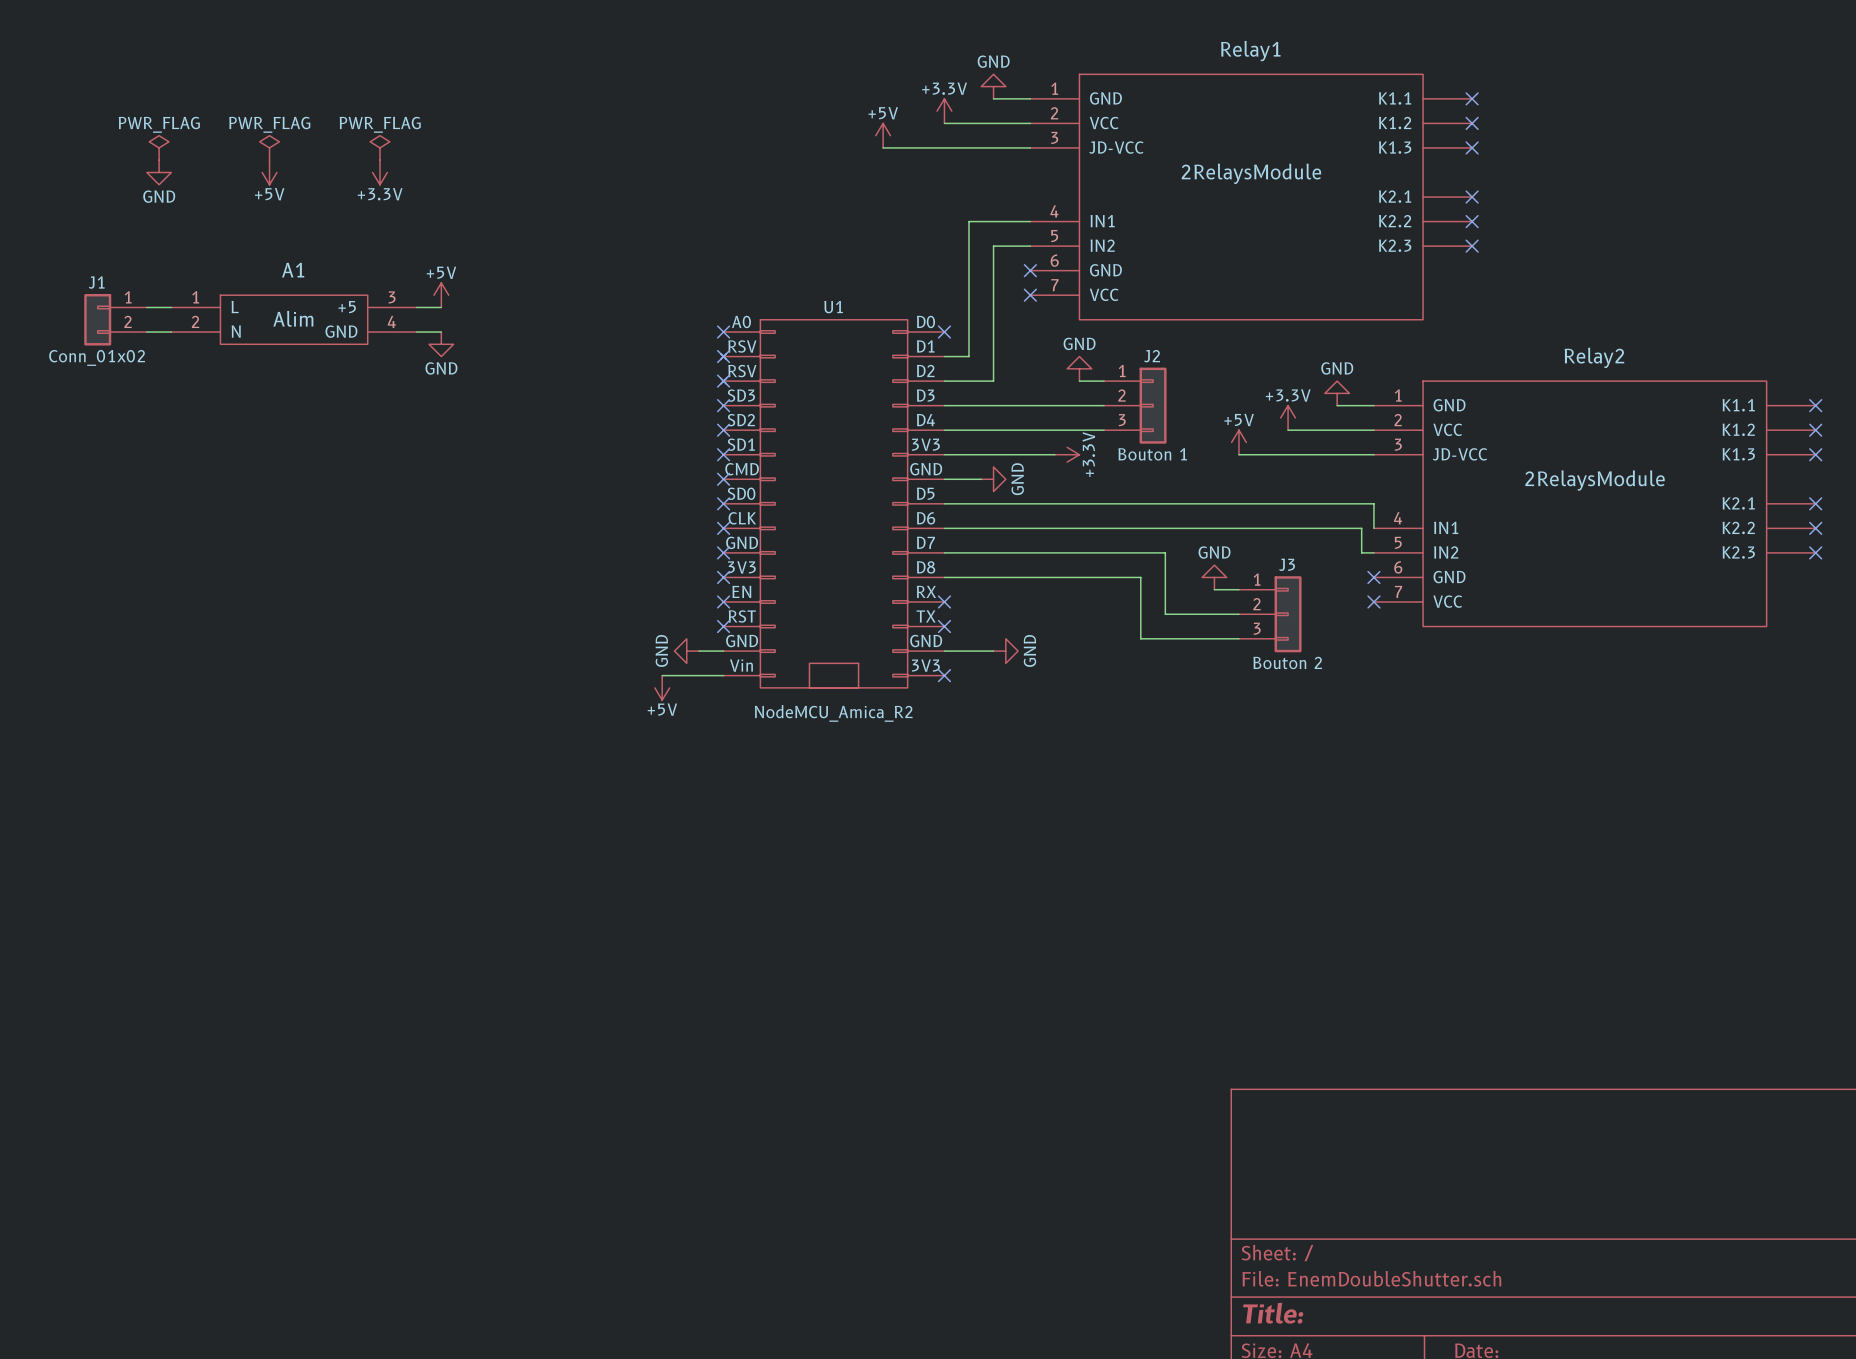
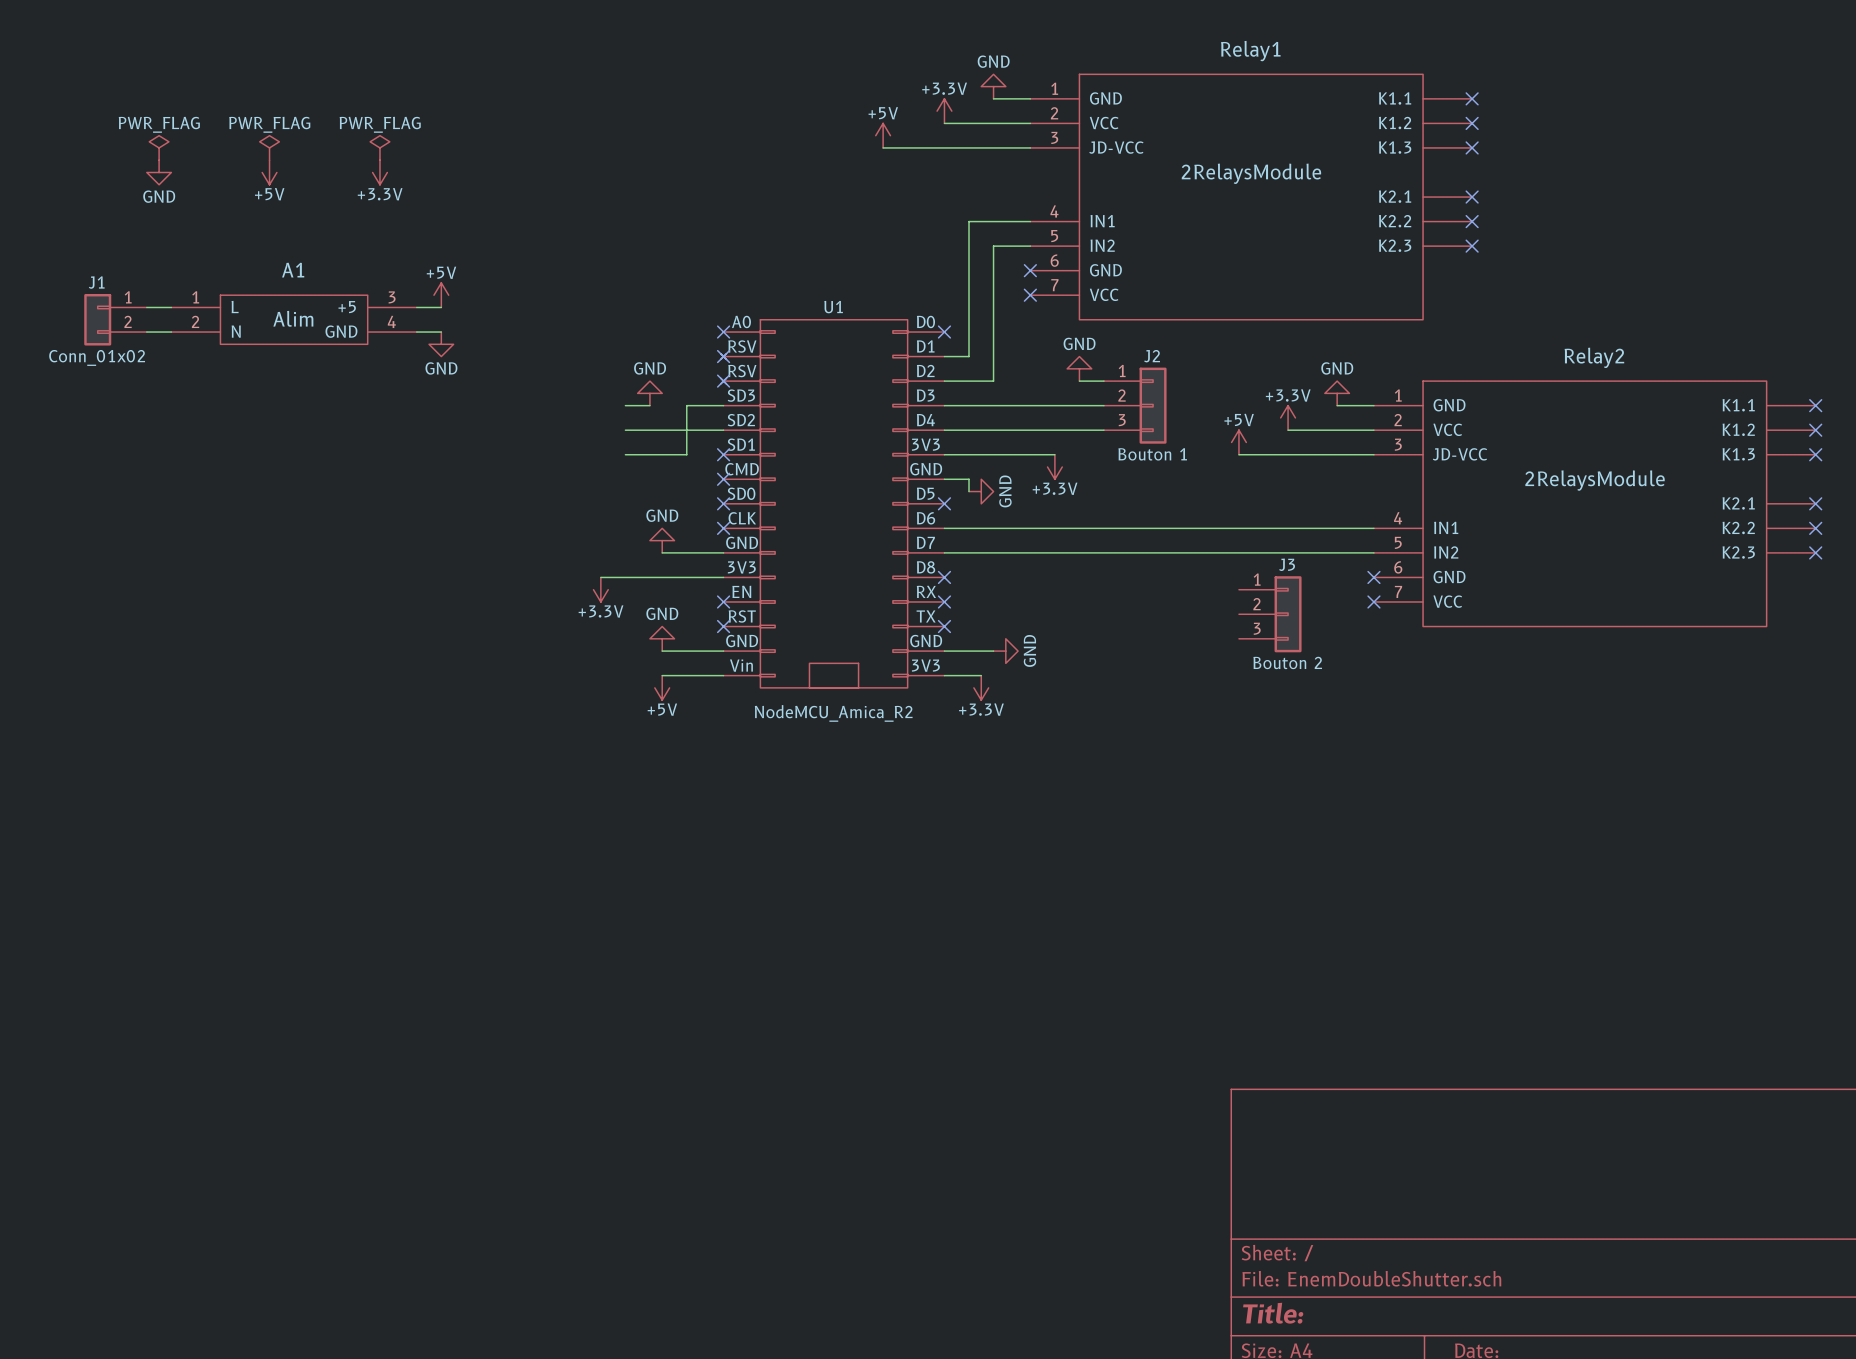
power symbol: none -> GND (649, 393)
wire: none -> (625, 405) (649, 405)
wire: none -> (723, 405) (686, 405) (686, 454) (625, 454)
no-connect mark: (723, 405) -> none
wire: none -> (625, 430) (723, 430)
no-connect mark: (723, 430) -> none
power symbol rotation: 0° (1067, 454) -> 90° clockwise (1054, 467)
power symbol position: +3.3V (1067, 454) -> +3.3V (1054, 467)
wire: (969, 479) (981, 479) -> (969, 479) (969, 491)
power symbol position: GND (993, 479) -> GND (981, 491)
wire: (944, 503) (1373, 503) (1373, 528) -> none
no-connect mark: none -> (944, 503)
wire: (1361, 528) (1361, 552) -> (1361, 528) (1373, 528)
power symbol: none -> GND (662, 540)
wire: none -> (662, 552) (723, 552)
no-connect mark: (723, 552) -> none
wire: (1165, 552) (1165, 614) (1238, 614) -> (1165, 552) (1361, 552)
wire: none -> (600, 577) (723, 577)
no-connect mark: (723, 577) -> none
wire: (944, 577) (1140, 577) (1140, 638) (1238, 638) -> none
no-connect mark: none -> (944, 577)
power symbol: GND (1214, 577) -> none
power symbol: none -> +3.3V (600, 589)
wire: (1214, 589) (1238, 589) -> none
wire: none -> (662, 651) (699, 651)
power symbol rotation: 0° (686, 651) -> 90° clockwise (662, 638)
power symbol position: GND (686, 651) -> GND (662, 638)
wire: none -> (944, 675) (981, 675)
no-connect mark: (944, 675) -> none
power symbol: none -> +3.3V (981, 687)

